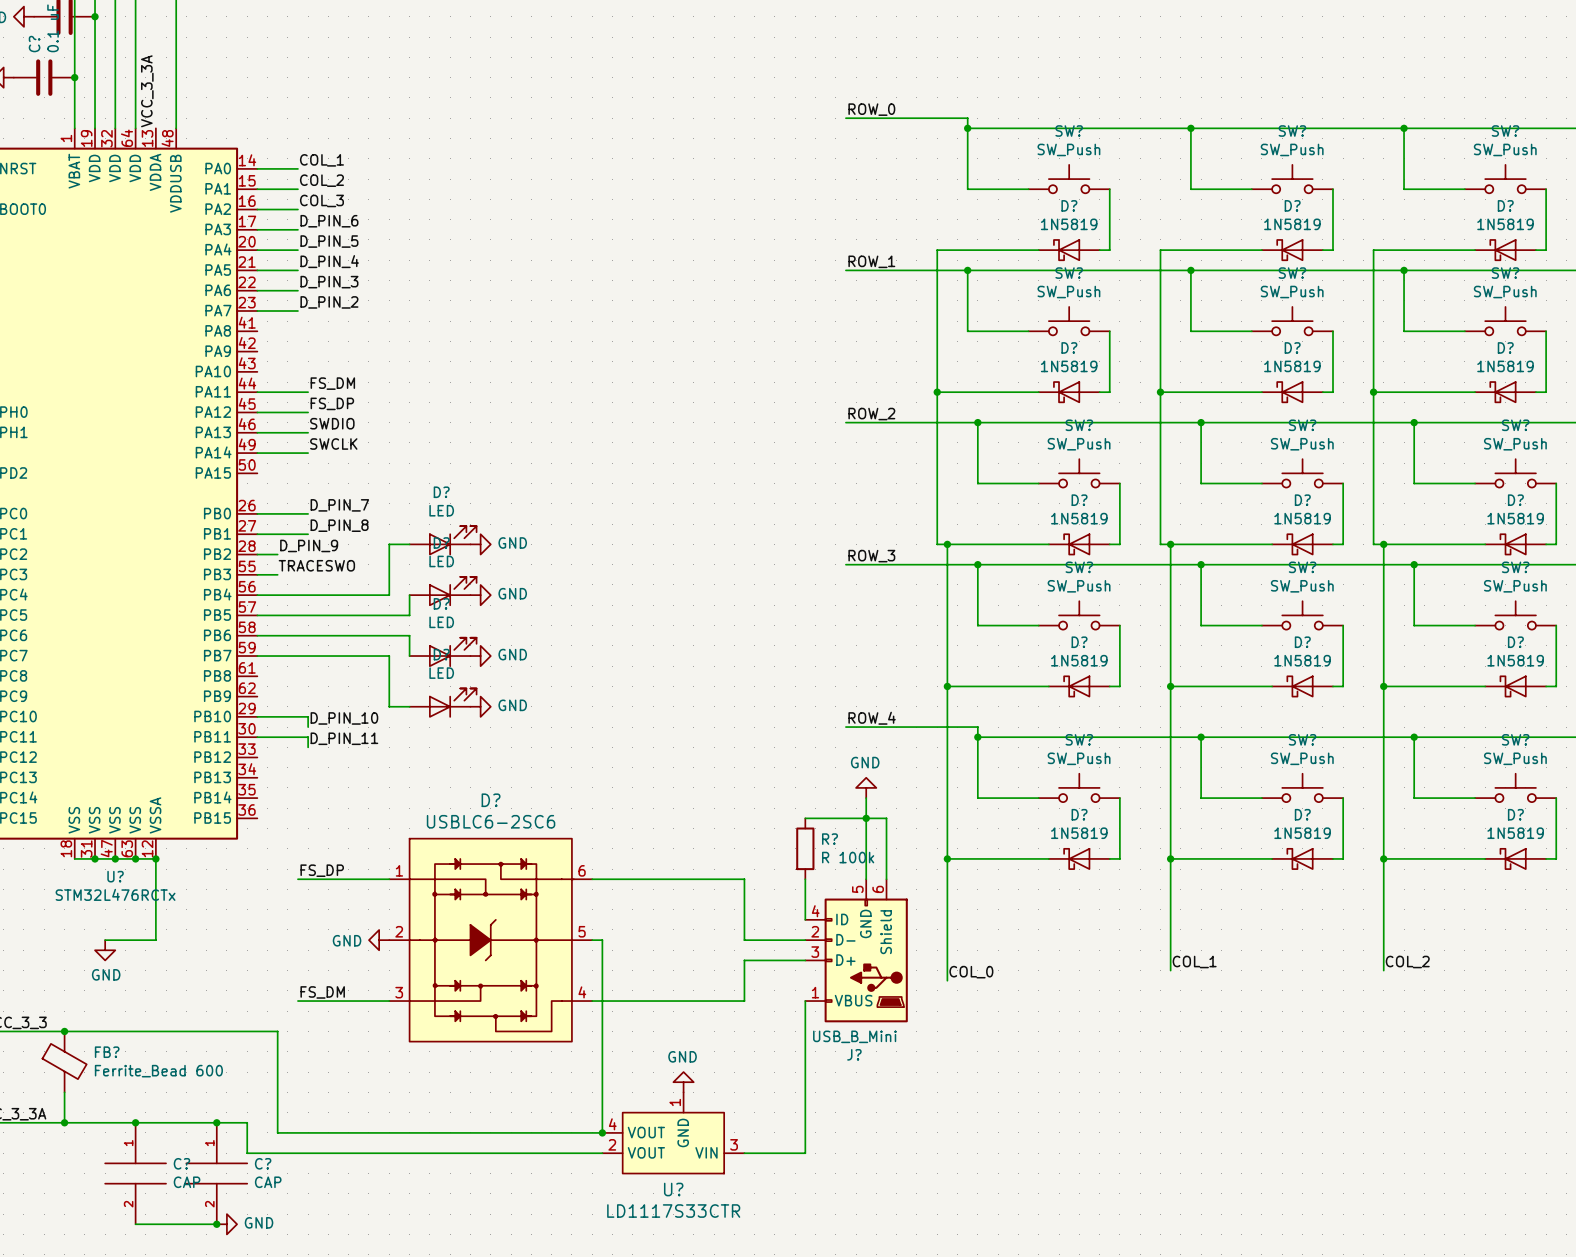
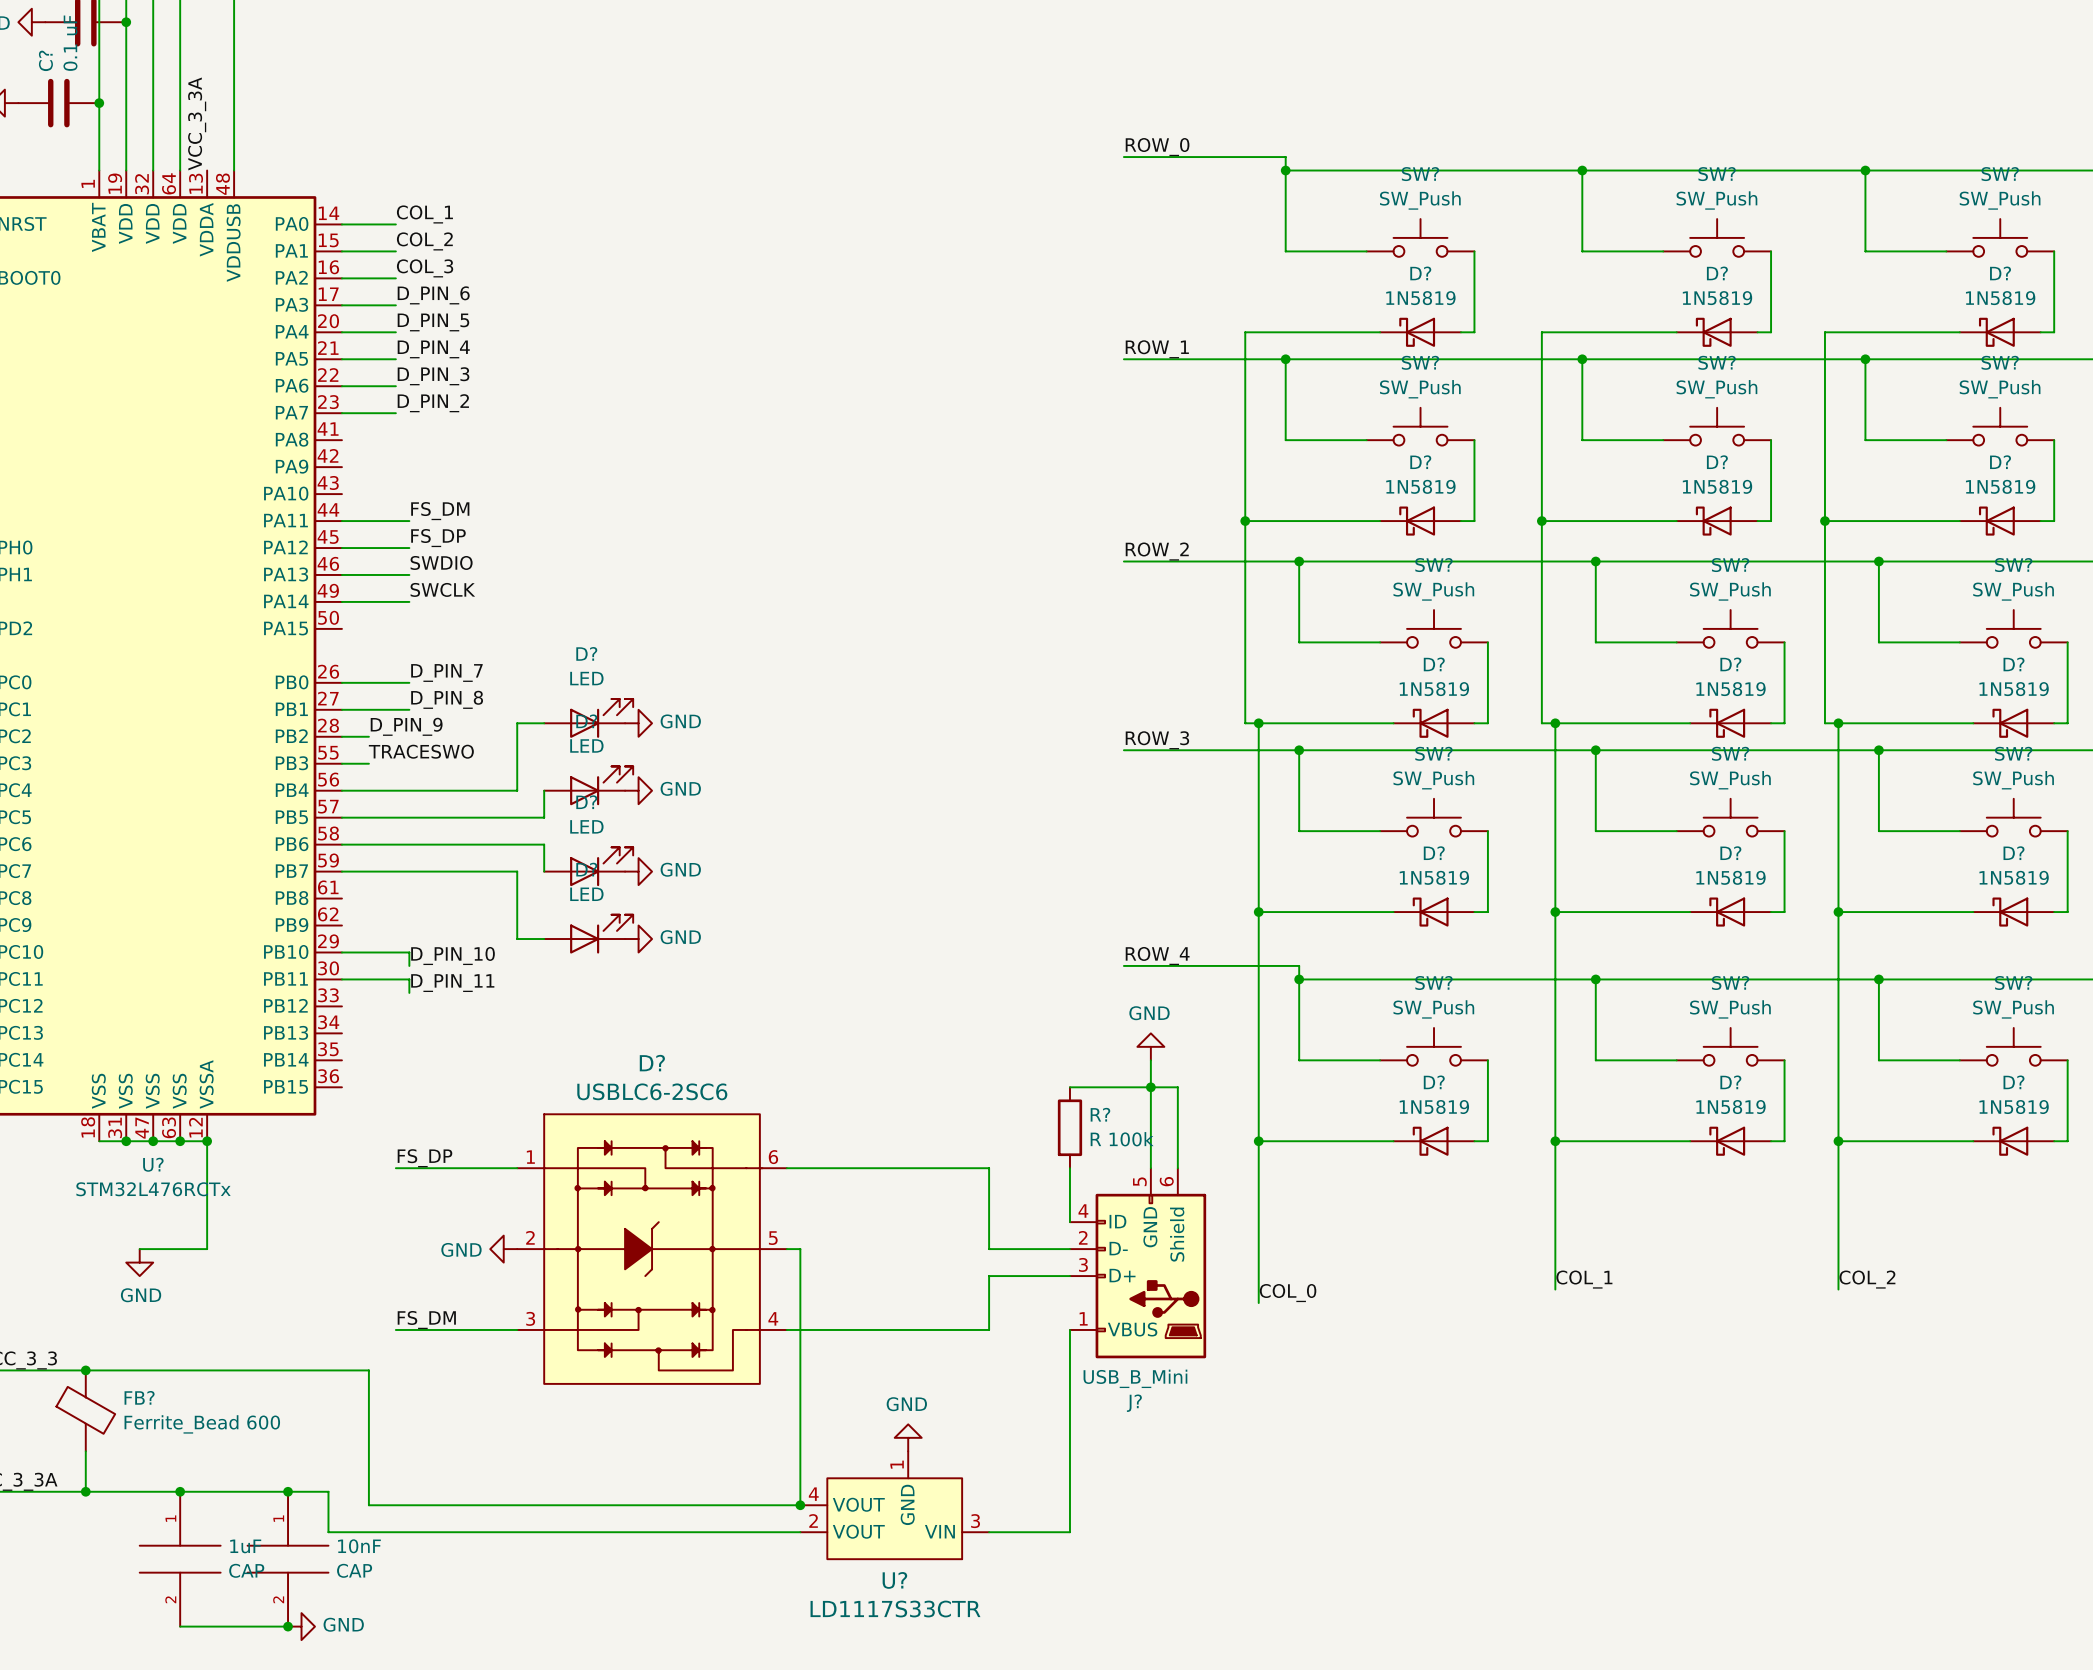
C? name: C? (181, 1163) -> 1uF (245, 1546)
C? name: C? (263, 1163) -> 10nF (359, 1546)

